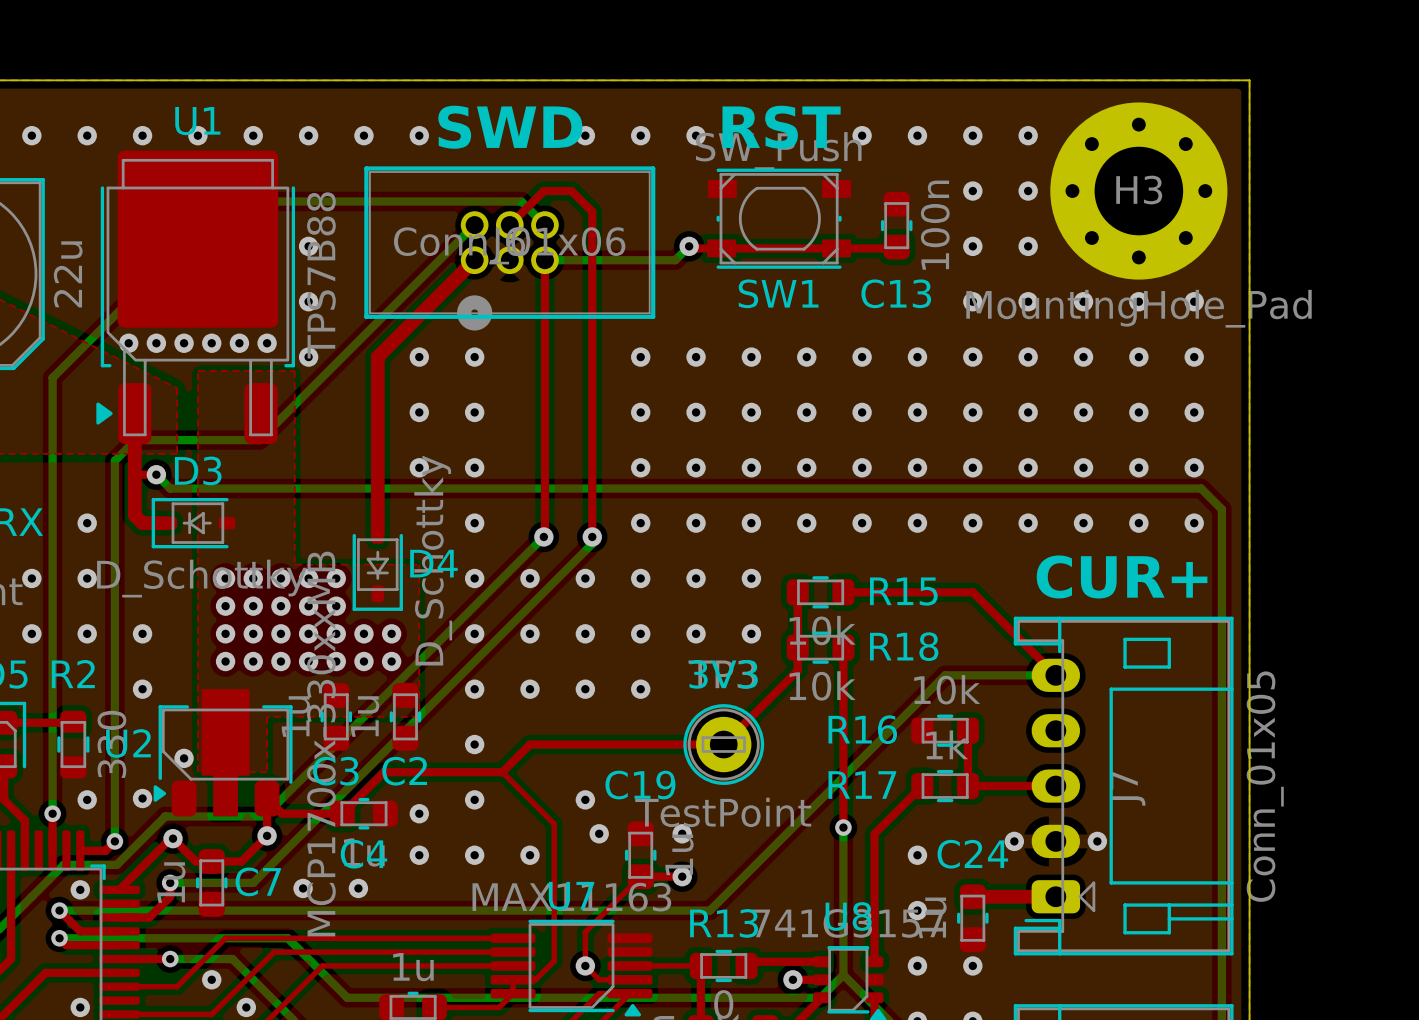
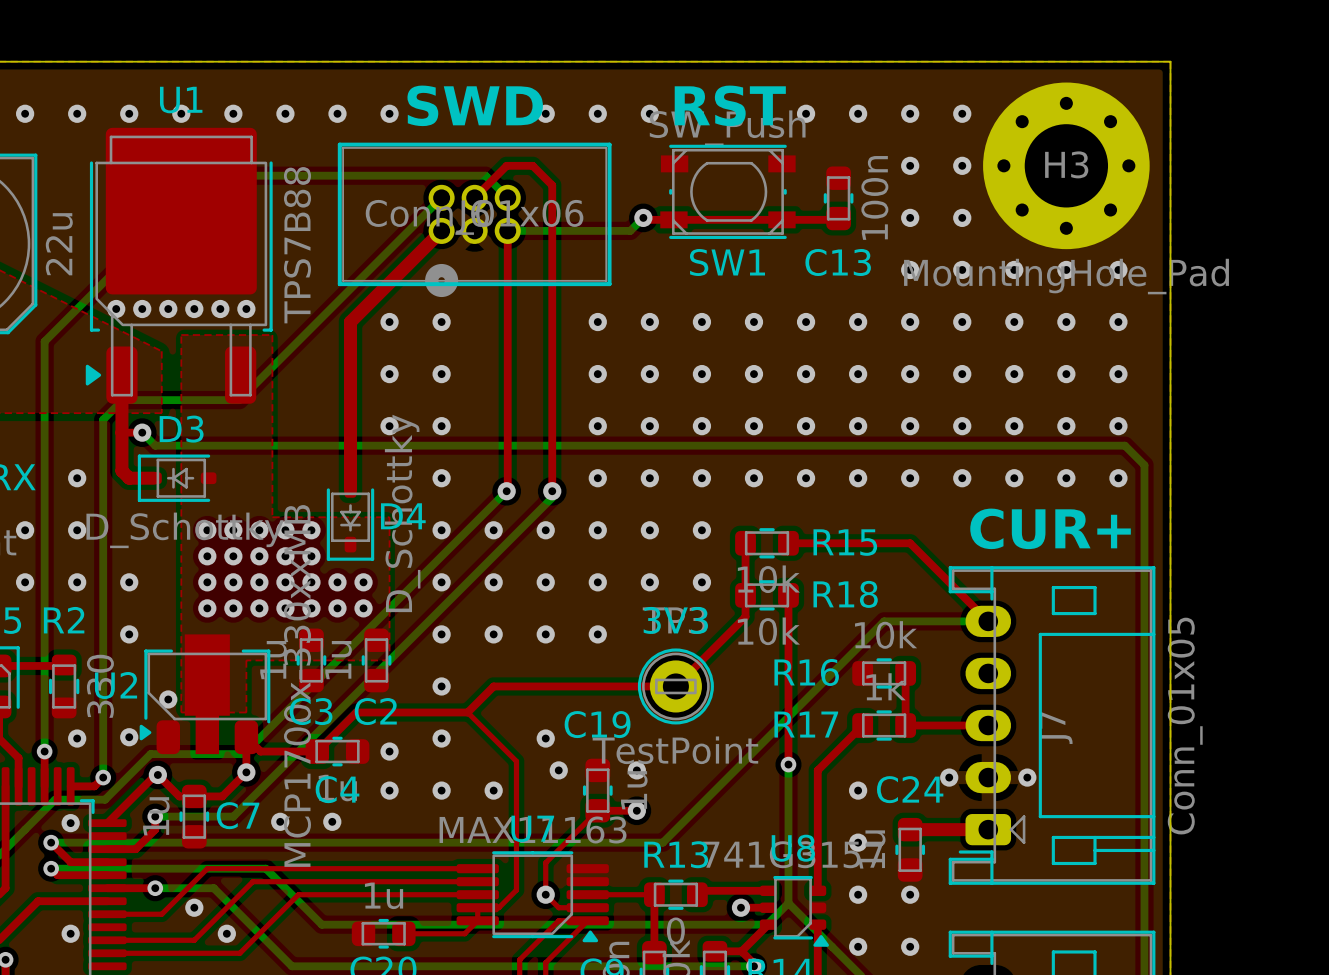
via: (308, 246) -> none
via: (308, 301) -> none
via: (308, 357) -> none

